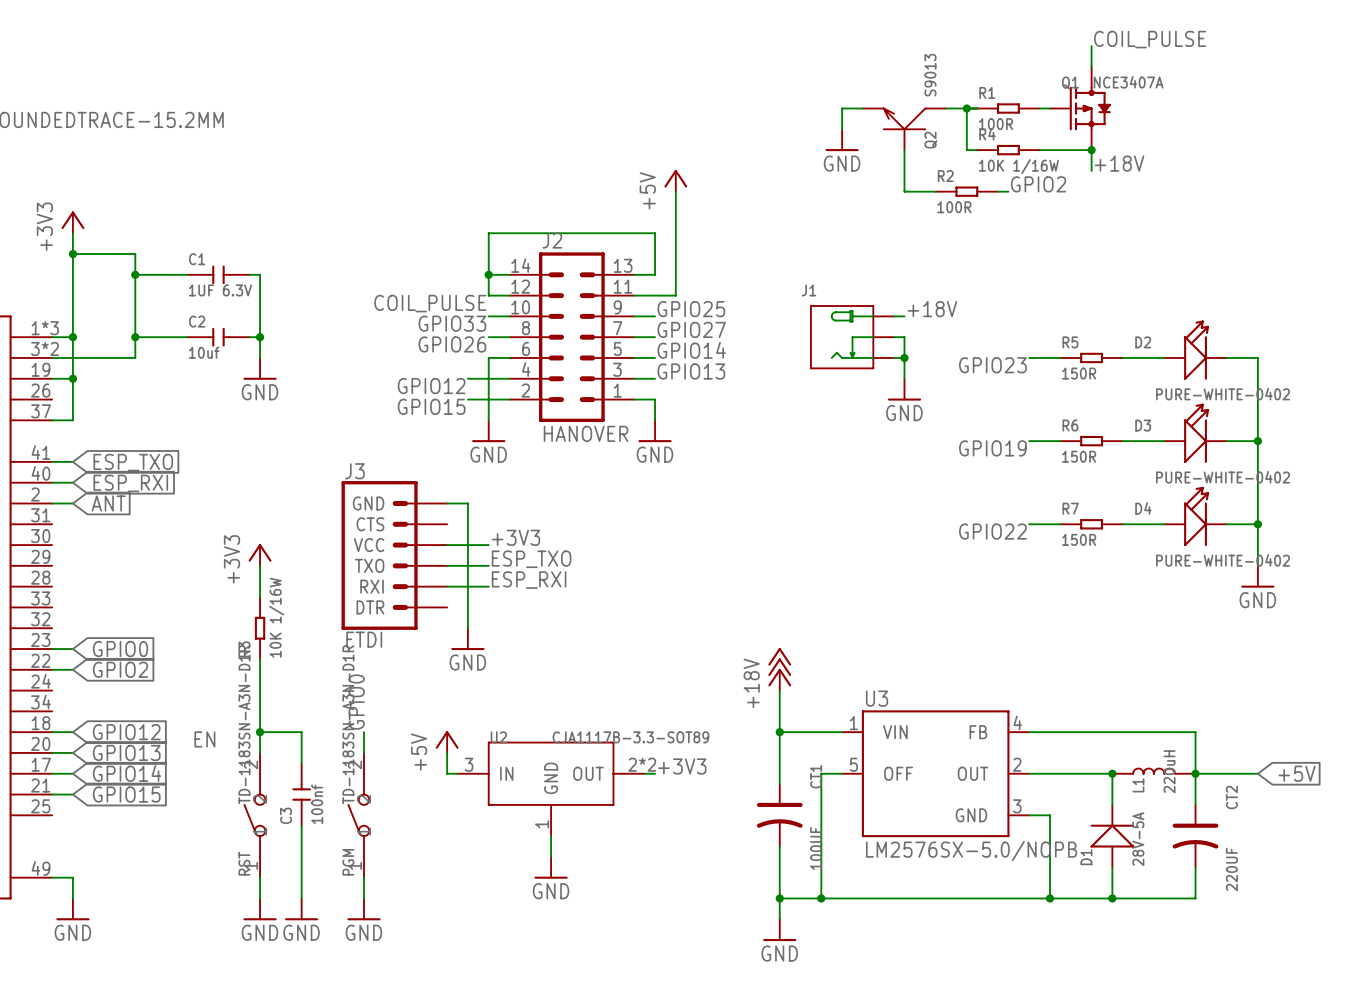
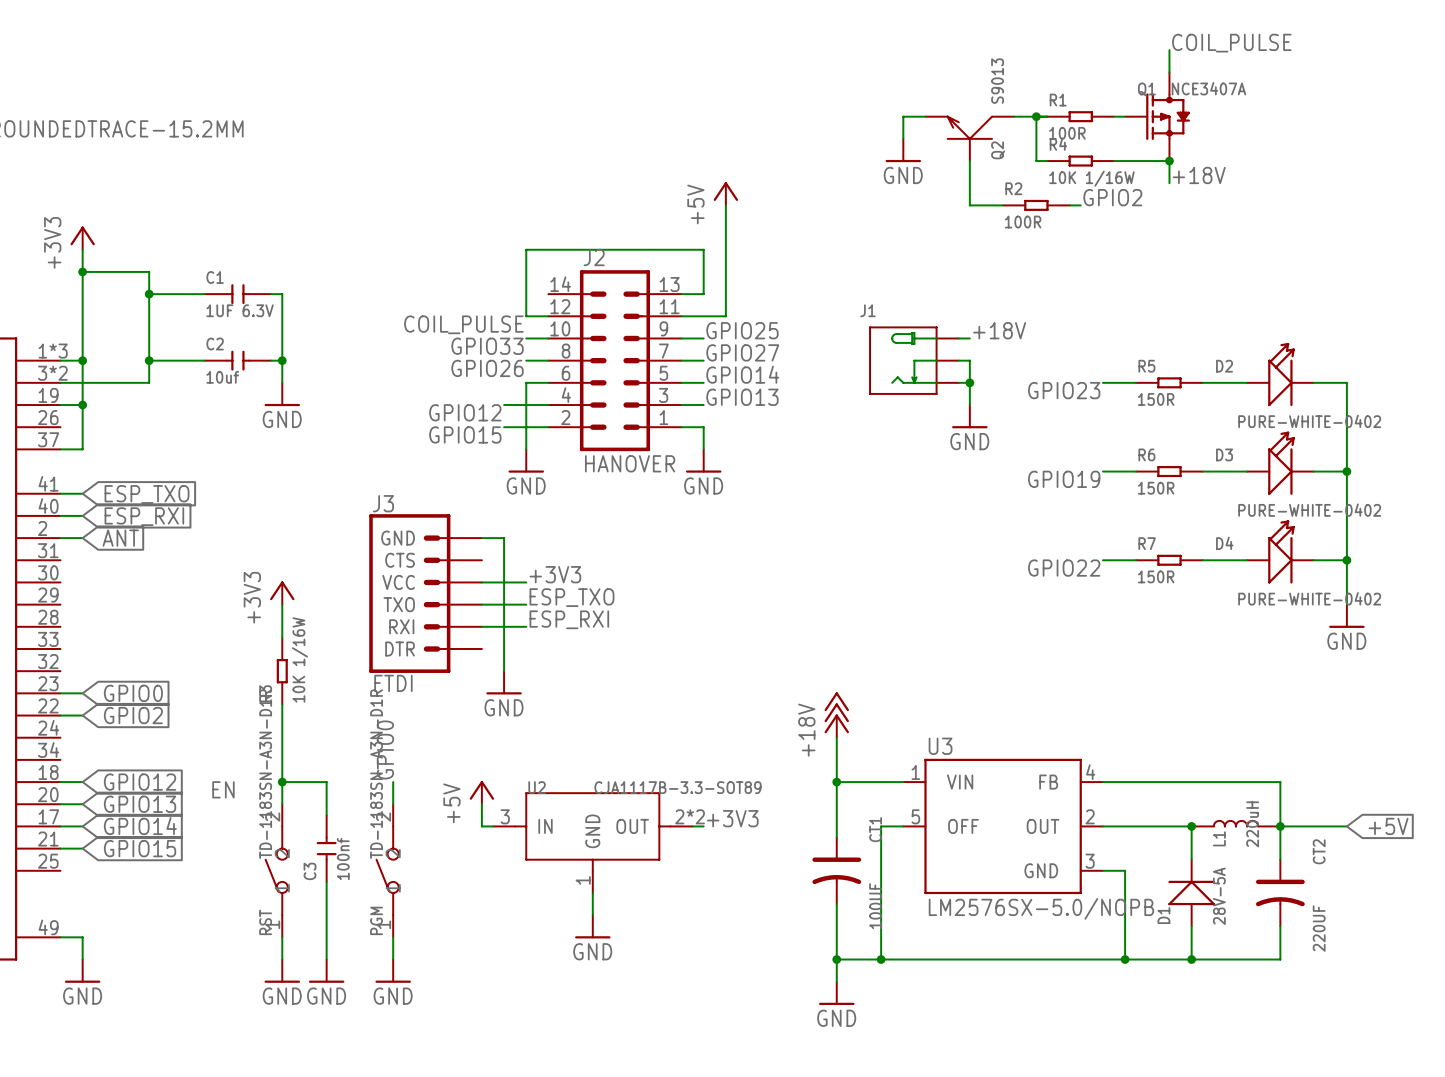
wire: (488, 274) (509, 274) -> none
junction: (488, 274) -> none

